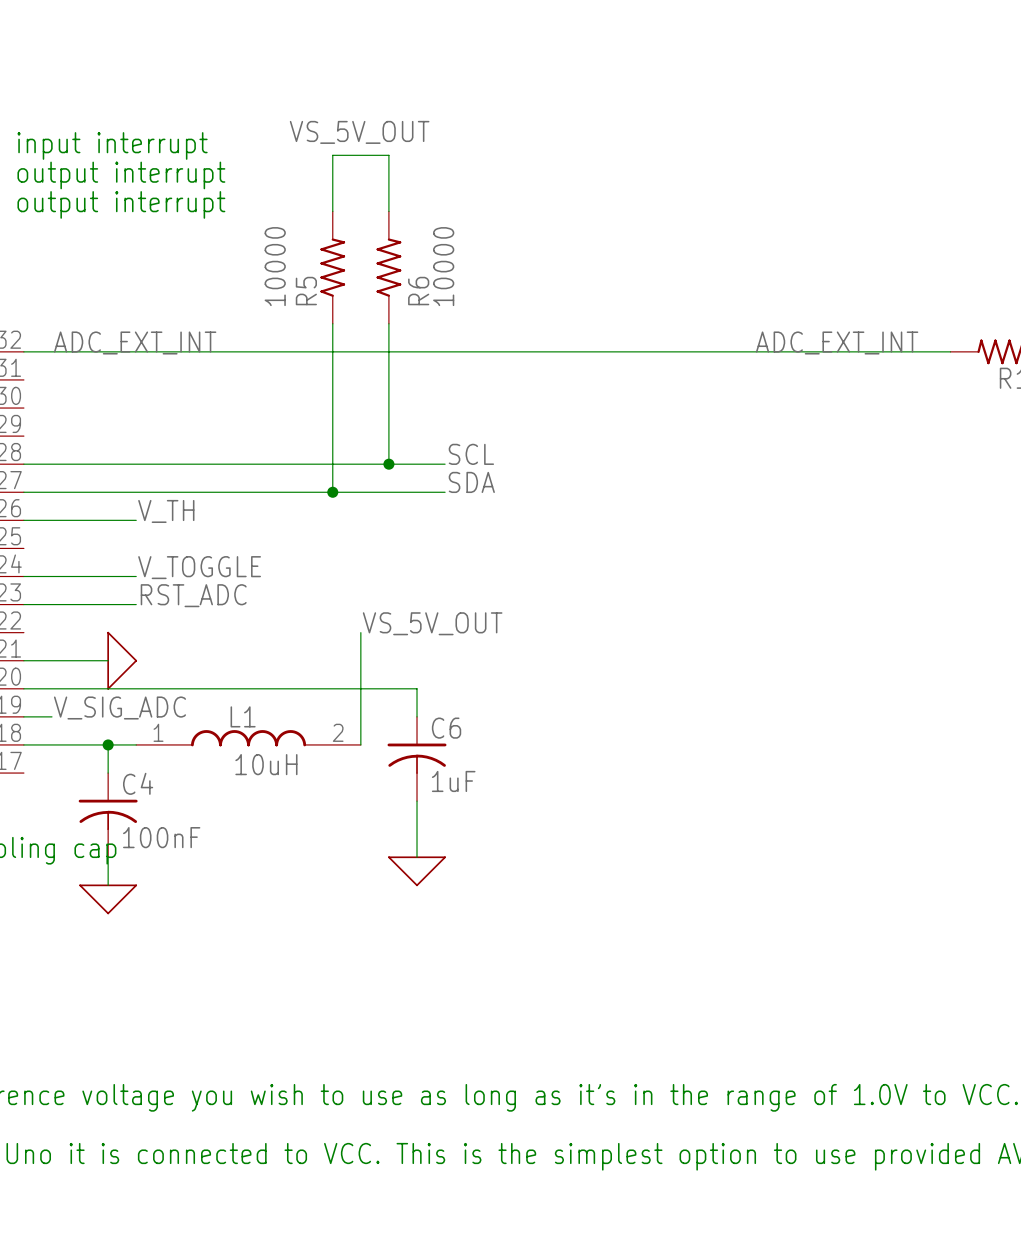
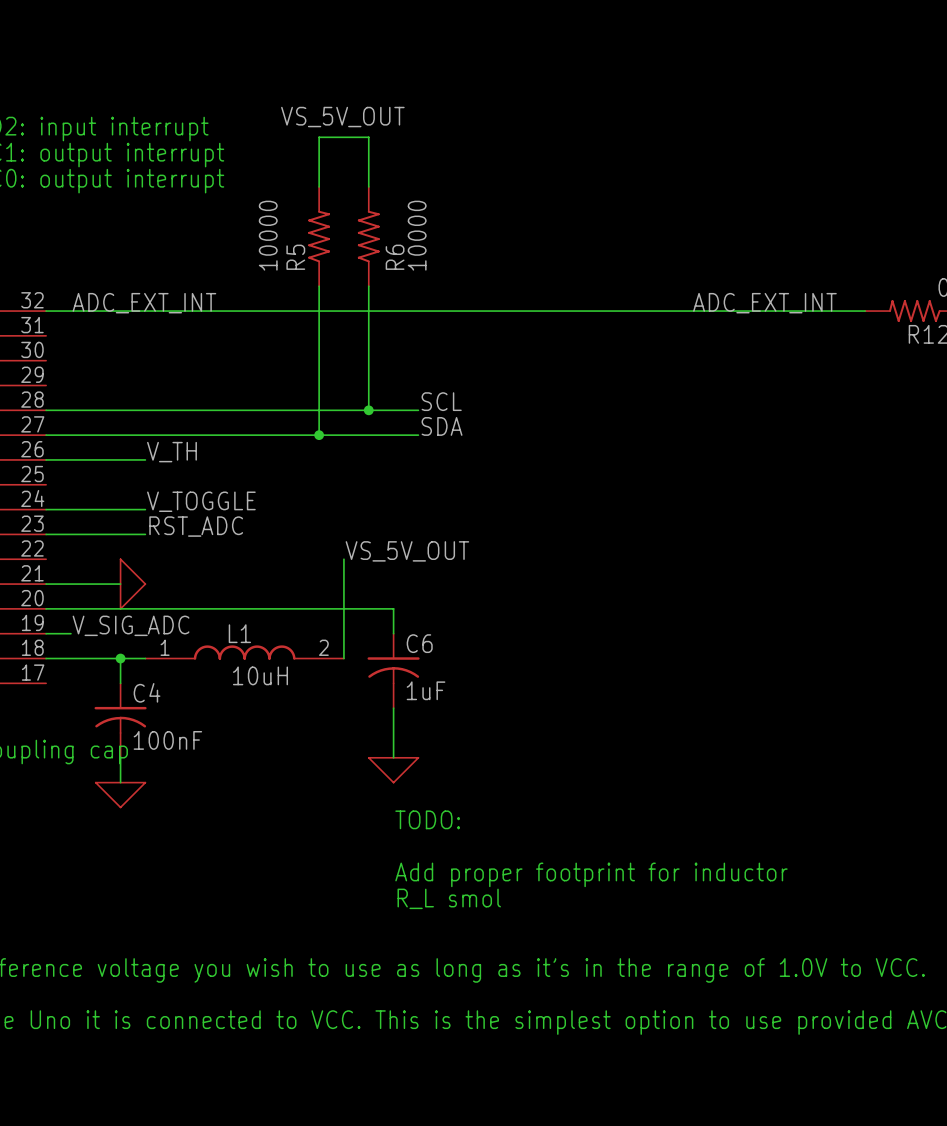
text: none -> TODO: (427, 819)
text: none -> Add proper footprint for inductor (591, 874)
text: none -> R_L smol (449, 898)

